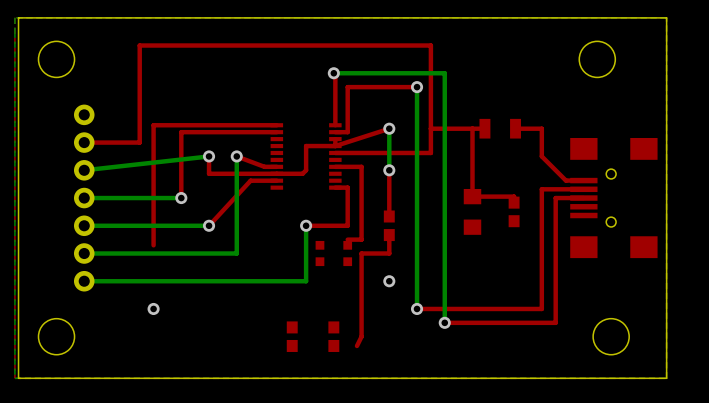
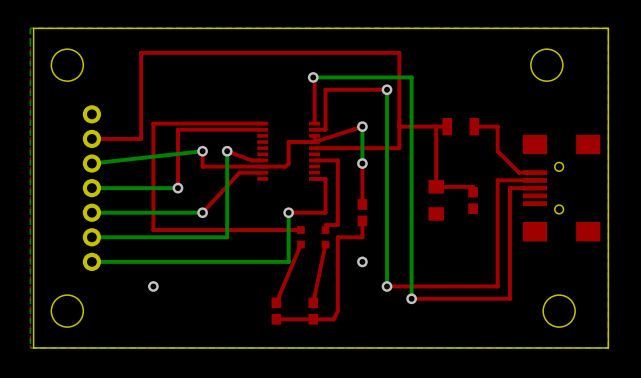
top track: none -> (300, 230) (153, 230)
top track: none -> (300, 244) (276, 302)
top track: none -> (325, 244) (313, 302)
top track: none -> (333, 319) (276, 319)

